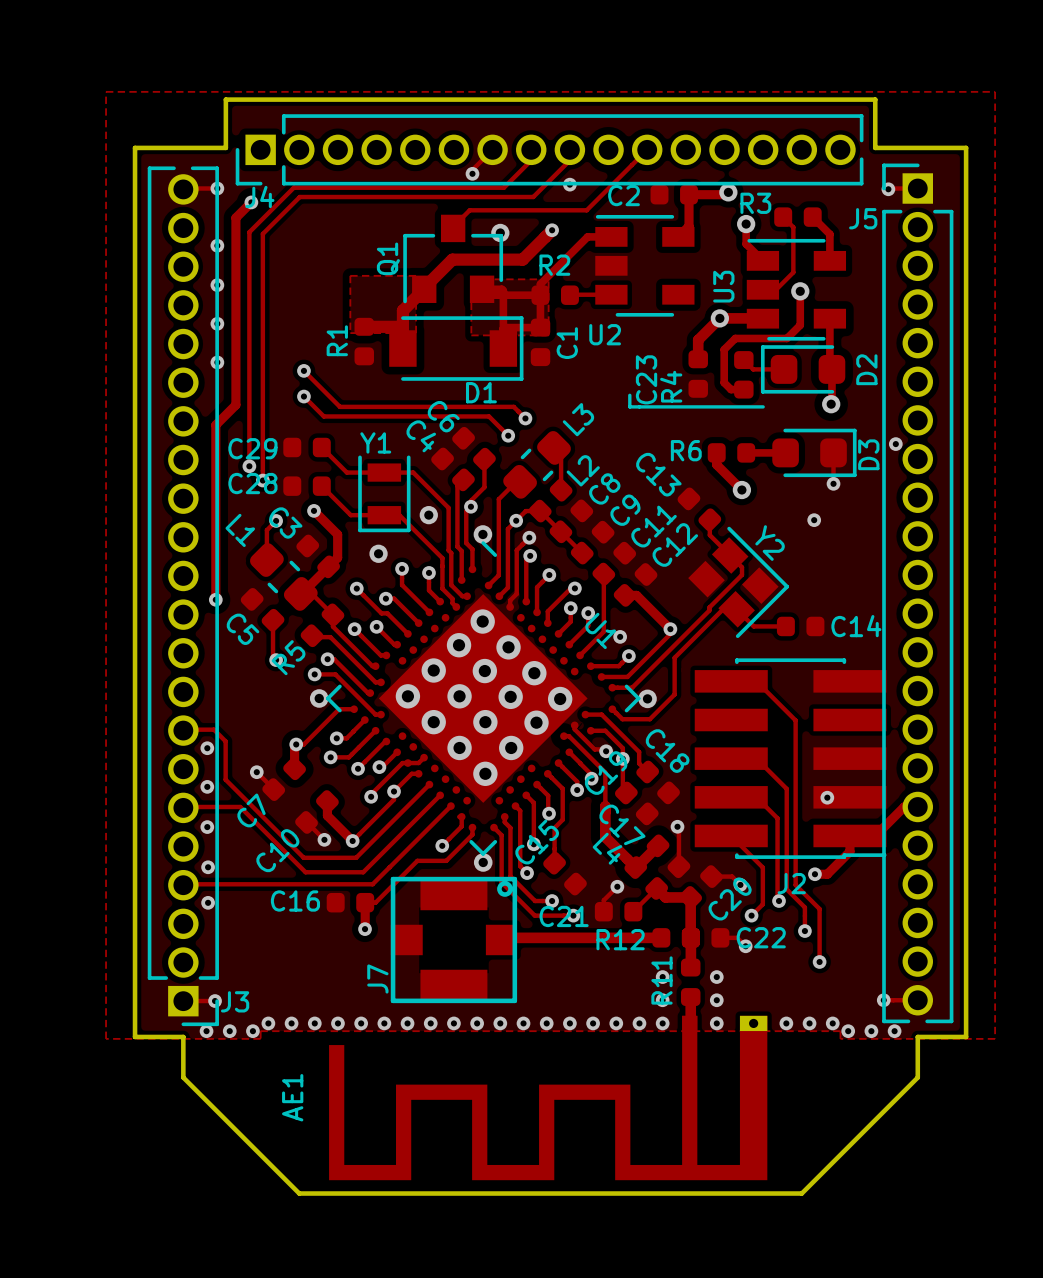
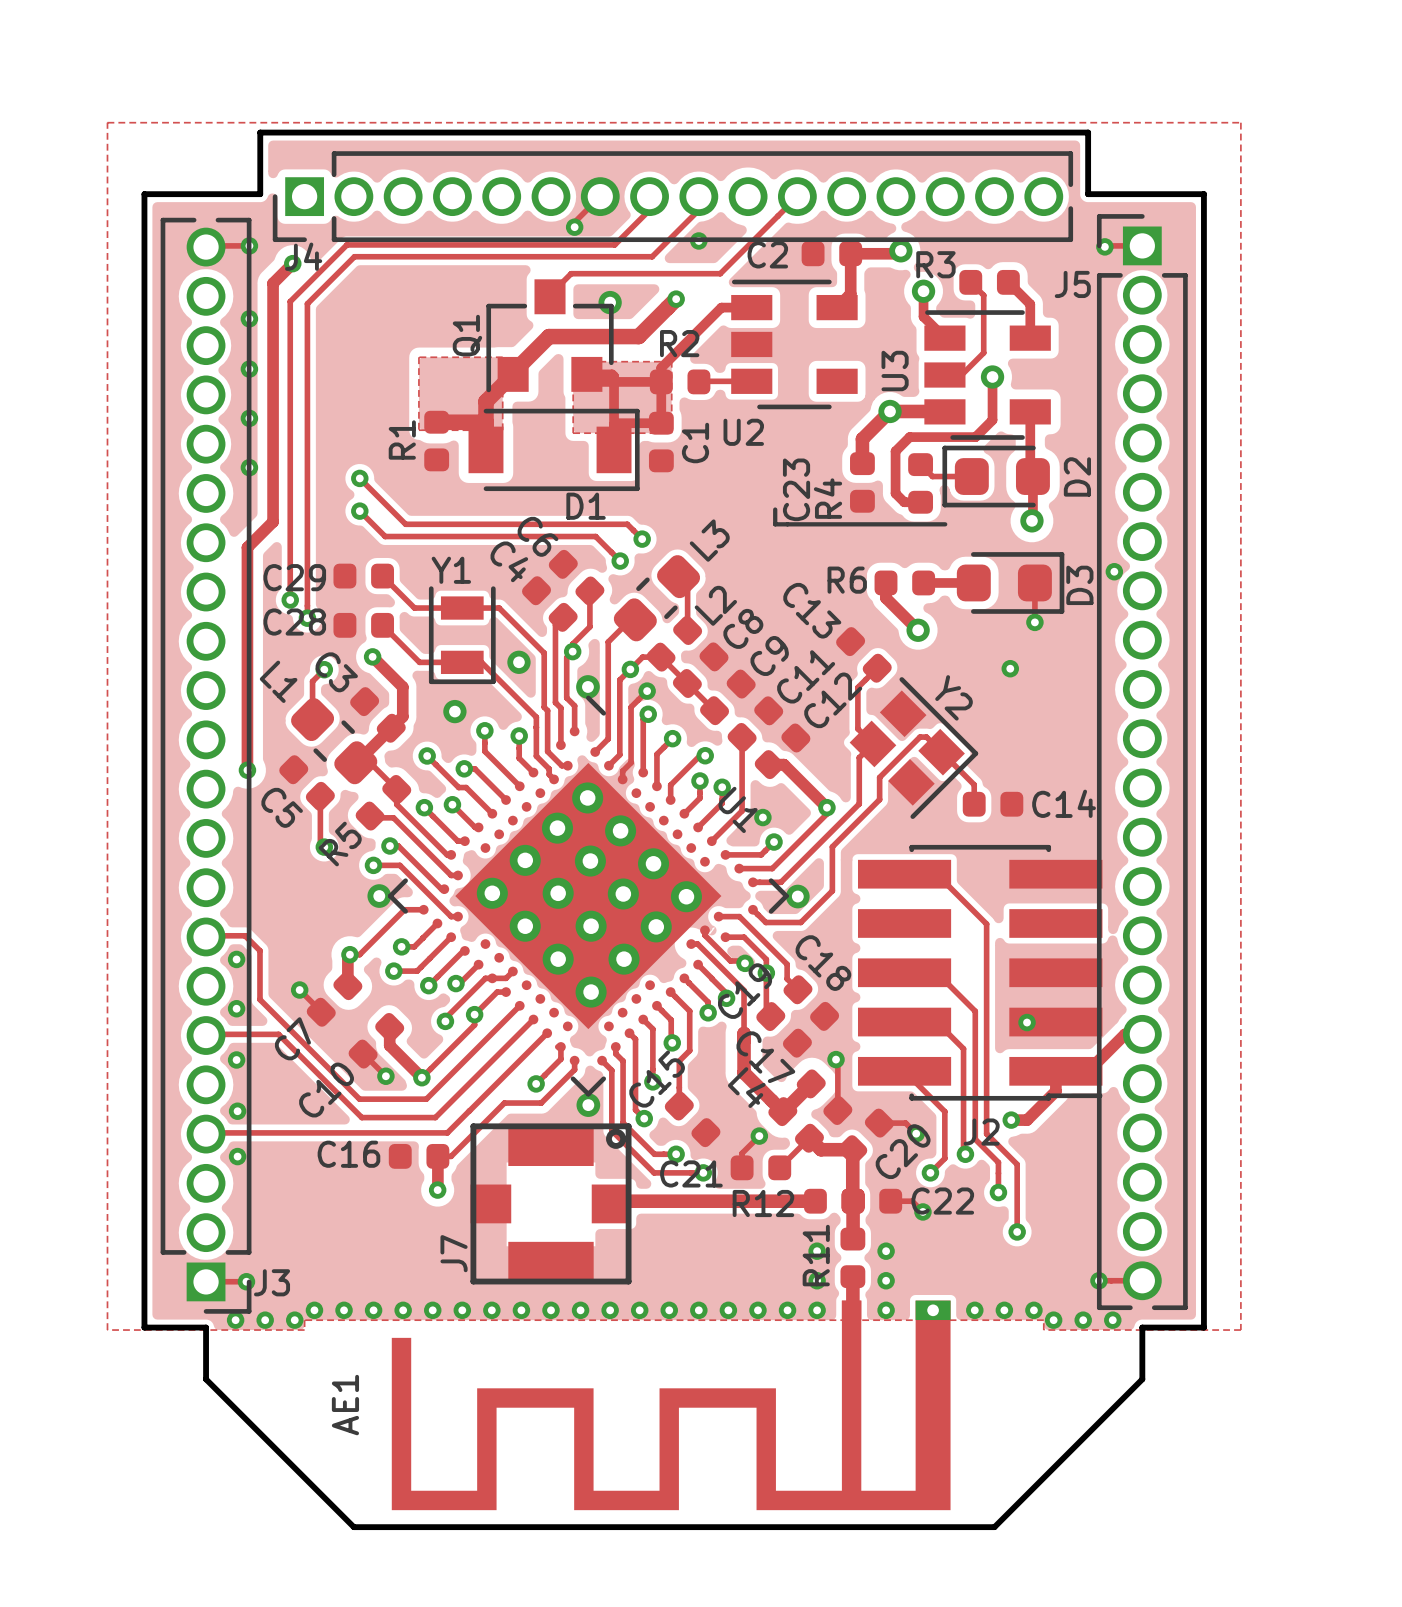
track: (709, 519) (709, 535) (742, 567) (742, 574) -> (877, 668) (857, 687) (857, 728) (872, 743) (859, 757) (859, 803) (780, 882) (778, 882)
track: (711, 605) (709, 610) (632, 687) -> (879, 777) (879, 799) (832, 846)
track: (785, 626) (753, 626) (736, 609) (723, 609) (674, 659) -> (974, 804) (974, 784) (926, 737) (918, 738)

